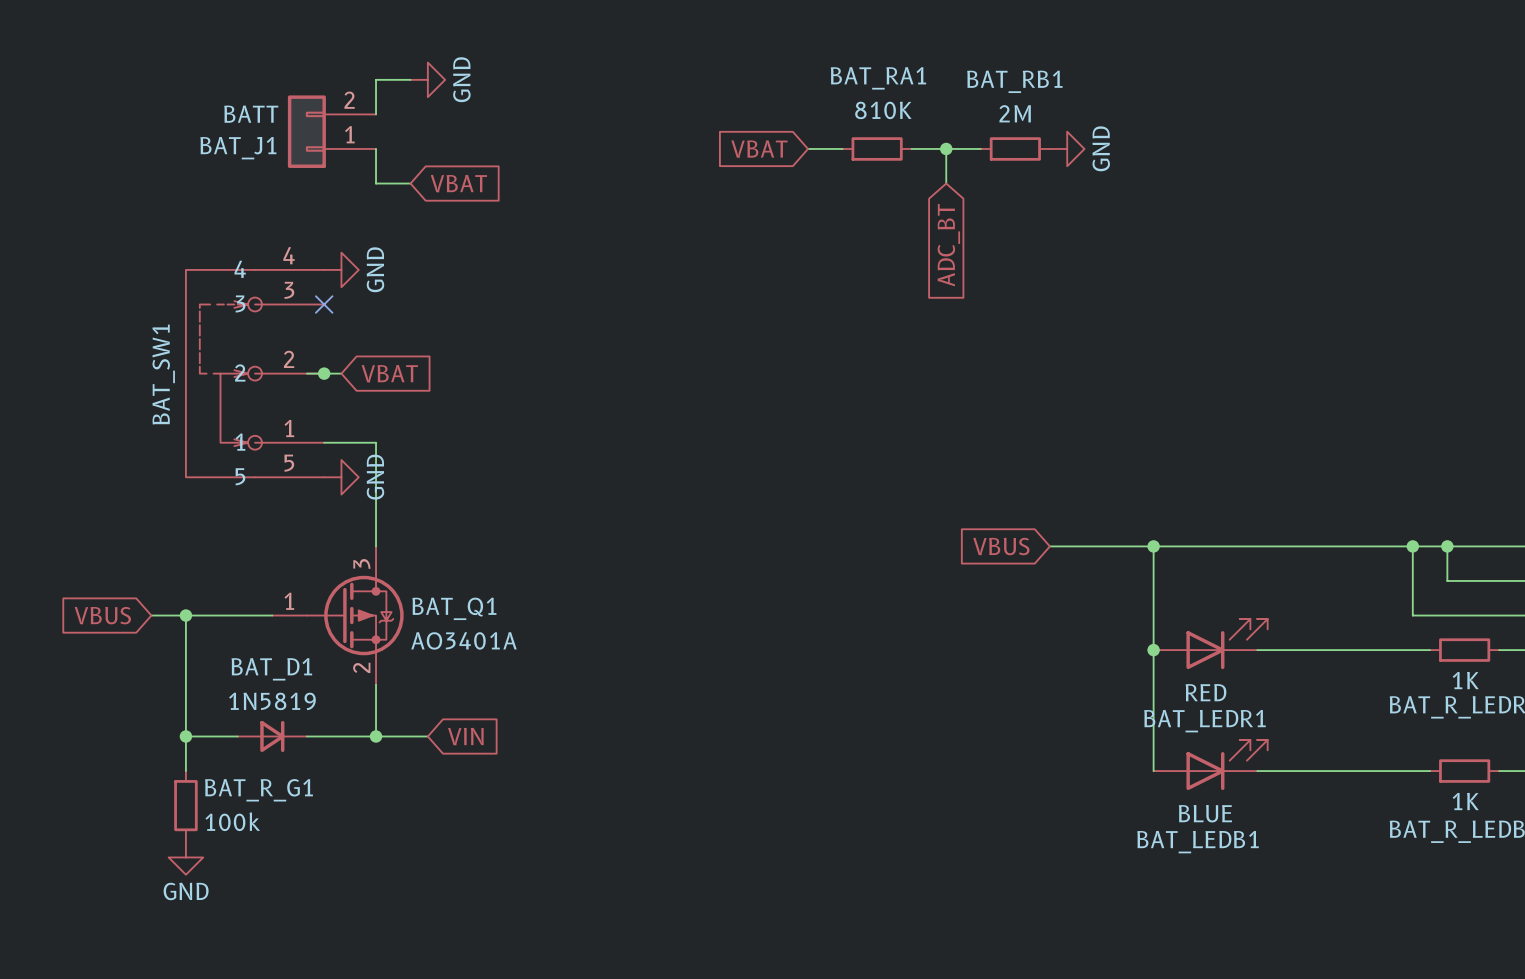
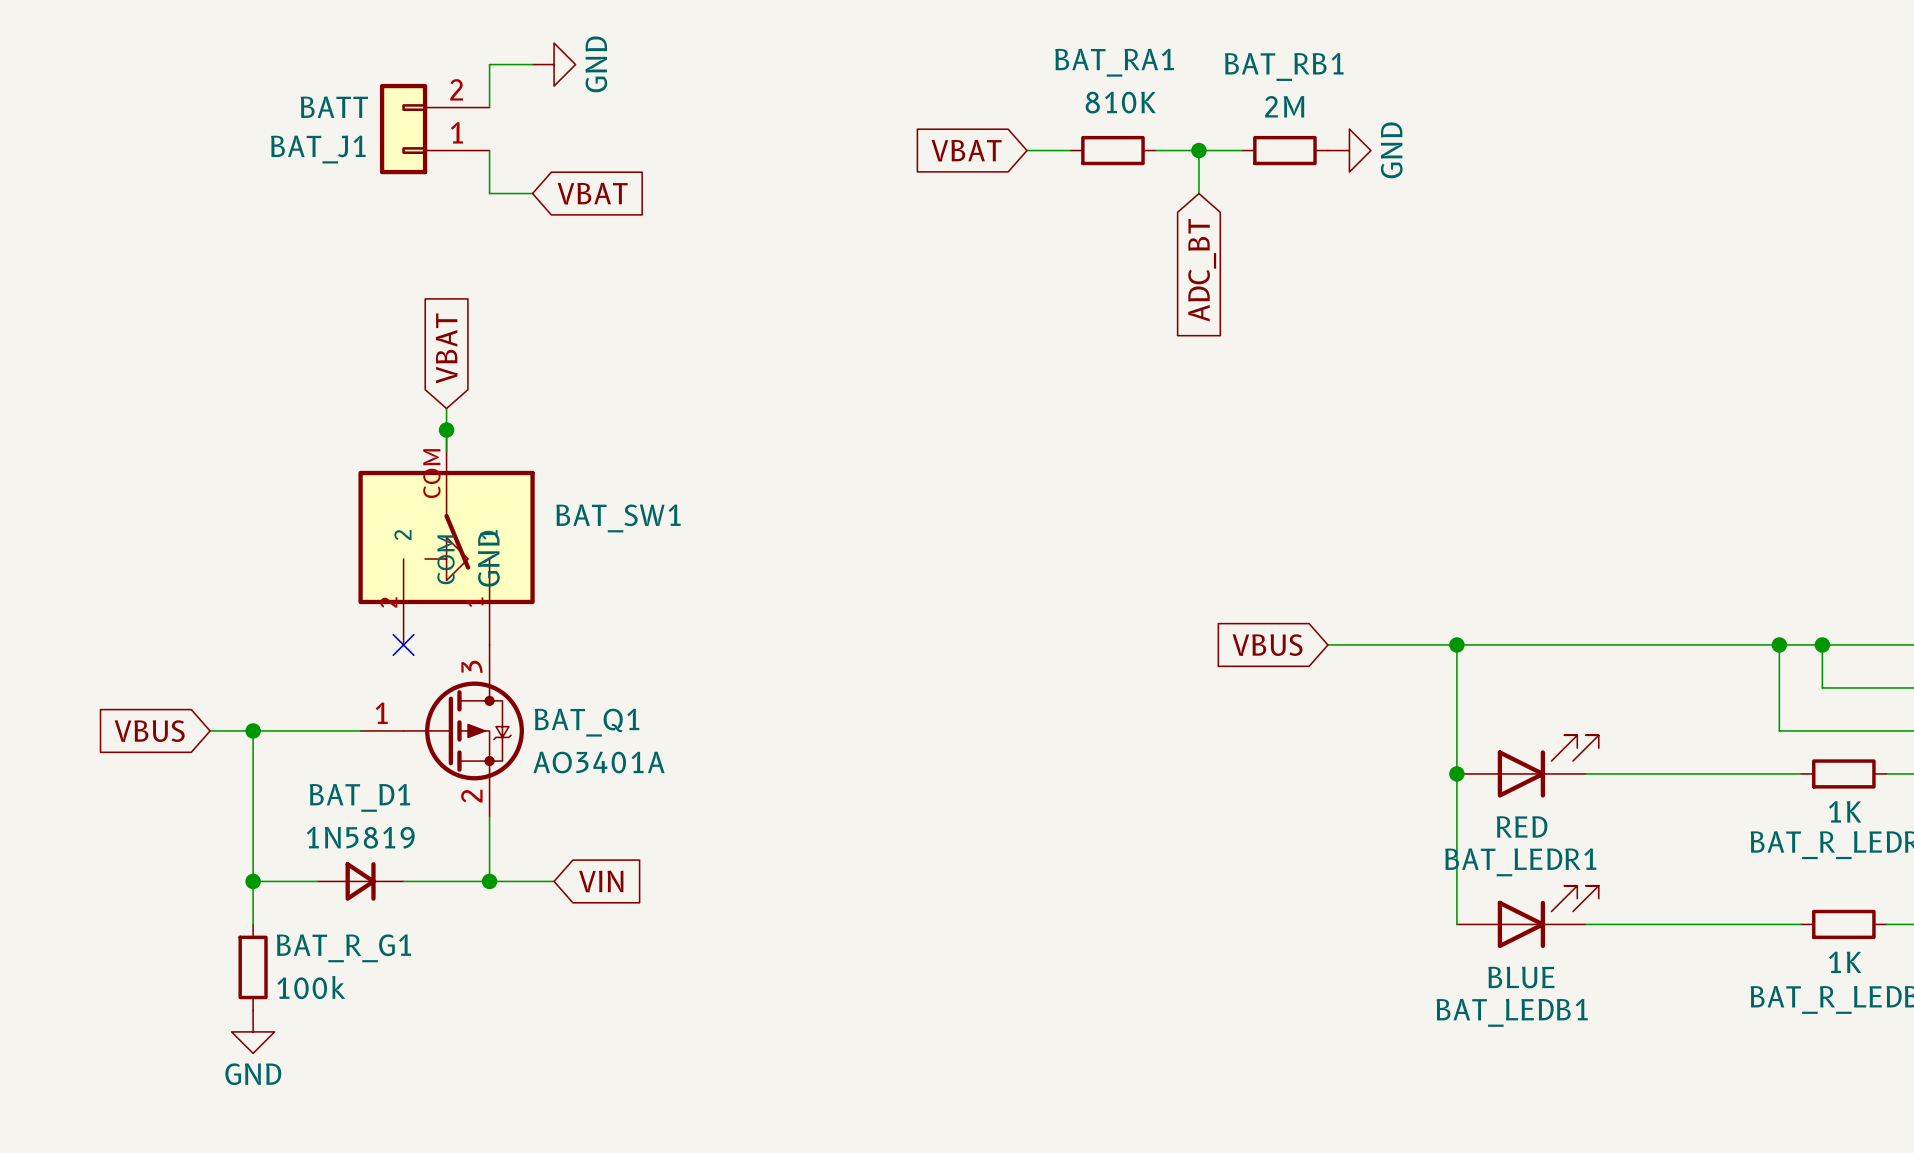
BAT_SW1 symbol: [185, 269, 325, 478] -> [358, 430, 535, 645]
power symbol: GND (341, 269) -> none
no-connect mark: (324, 304) -> none
wire: none -> (446, 408) (446, 451)
wire: (306, 373) (341, 373) -> none
junction position: (324, 373) -> (446, 430)
global label rotation: 0° (389, 373) -> 90° counterclockwise (446, 348)
BAT_SW1 name position: BAT_SW1 (163, 374) -> BAT_SW1 (618, 518)
no-connect mark: none -> (403, 644)

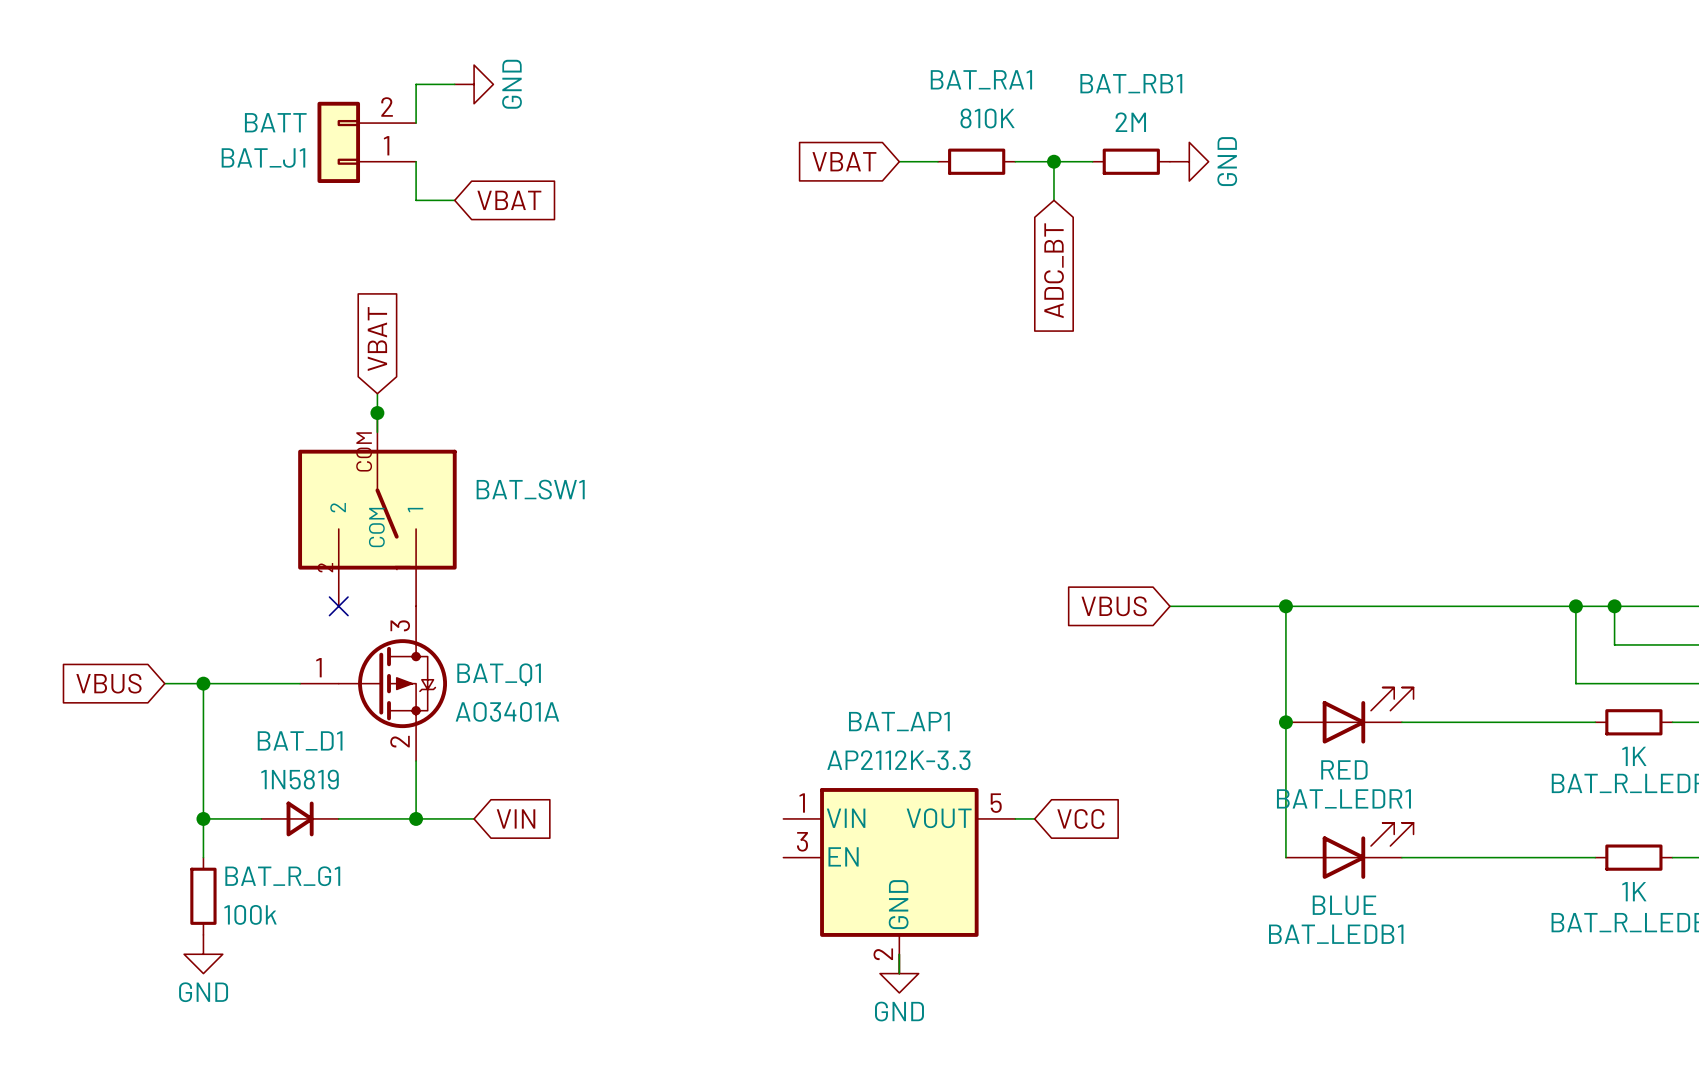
power symbol: GND (446, 558) -> none
wire: none -> (1015, 818) (1034, 818)
global label: none -> VCC (1080, 818)
BAT_AP1: none -> AP2112K-3.3 (899, 880)
wire: none -> (899, 954) (899, 973)
power symbol: none -> GND (899, 973)

